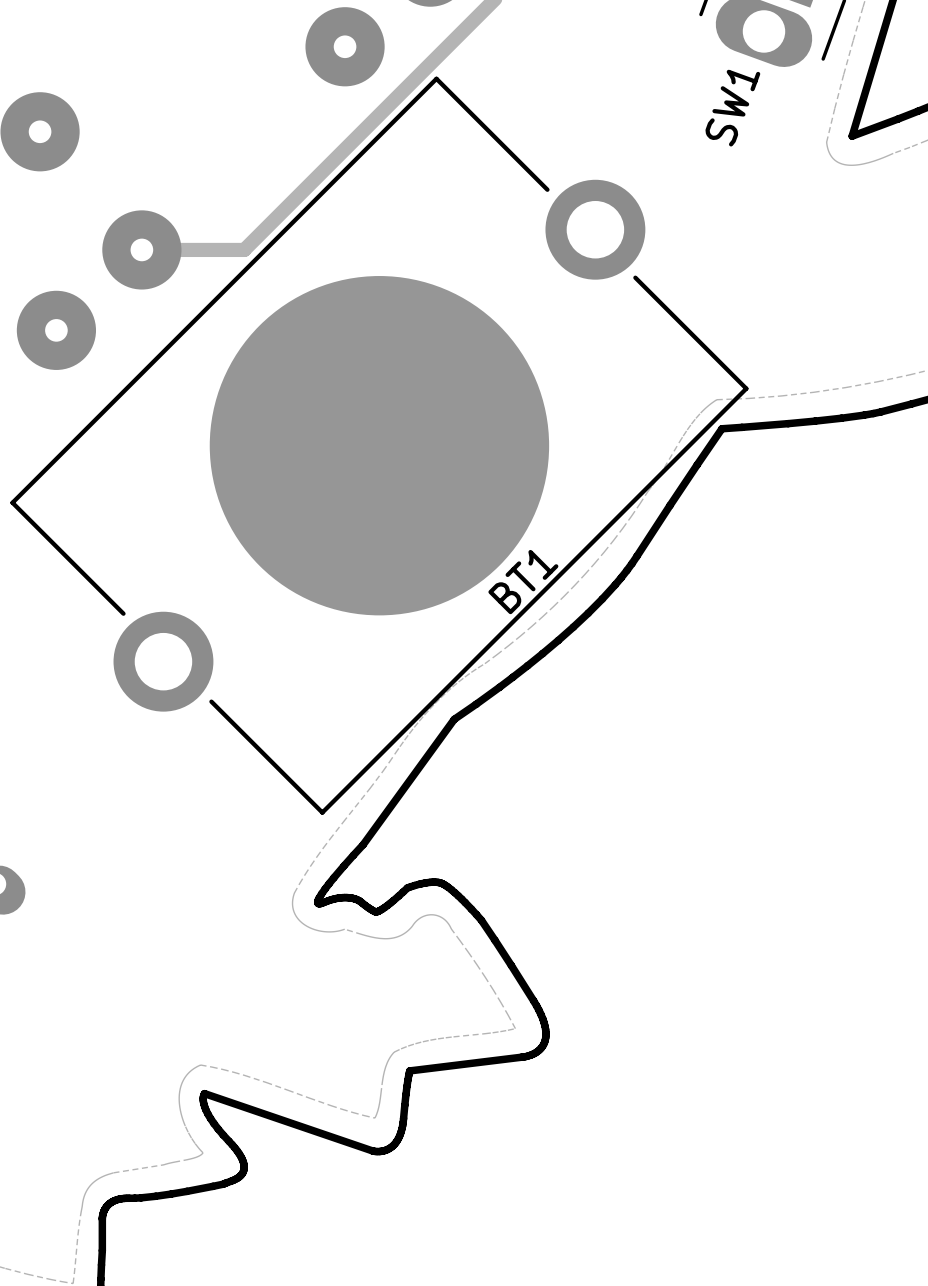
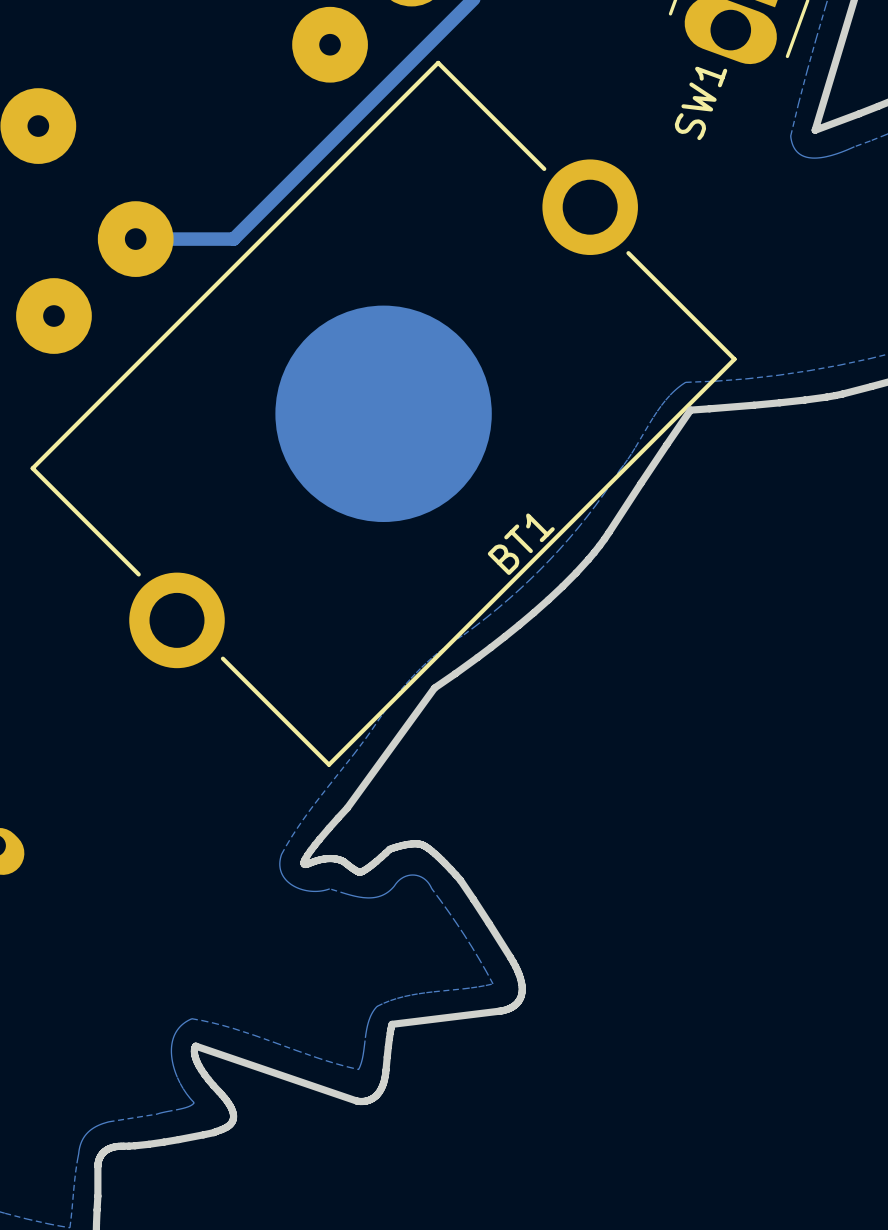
BT1 footprint: [10, 76, 749, 815] -> [30, 60, 737, 767]

